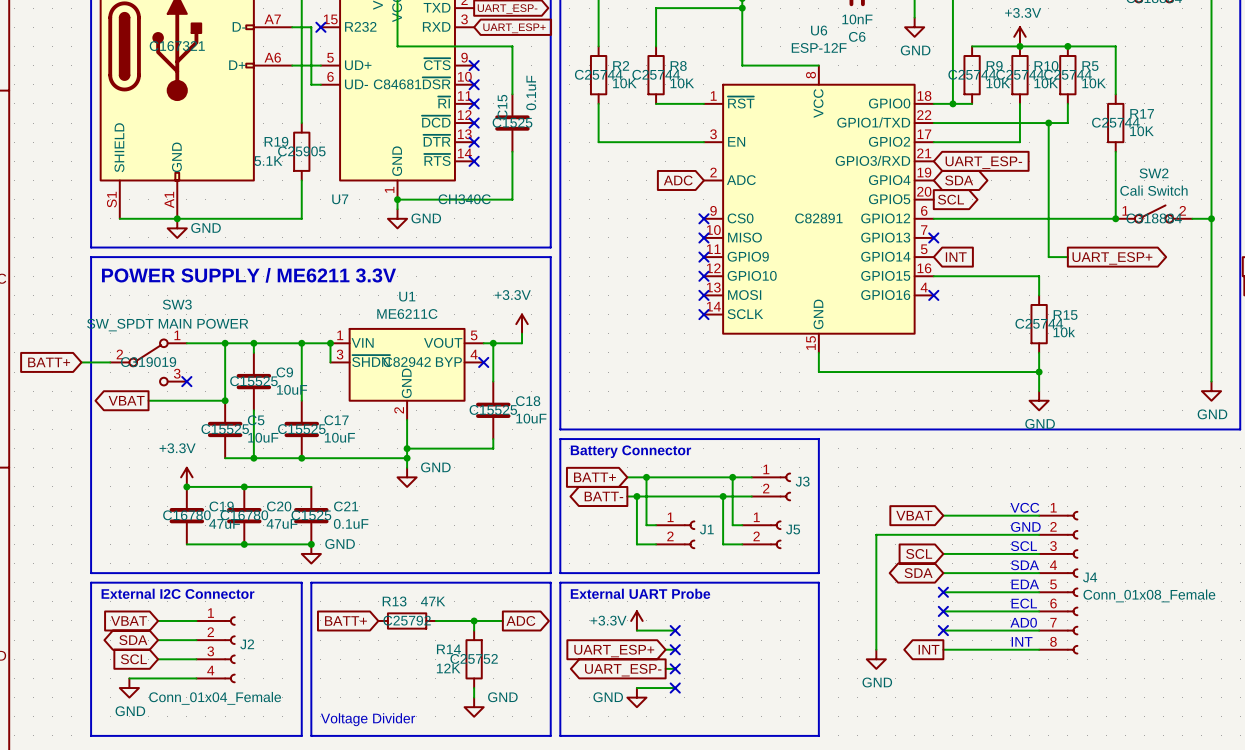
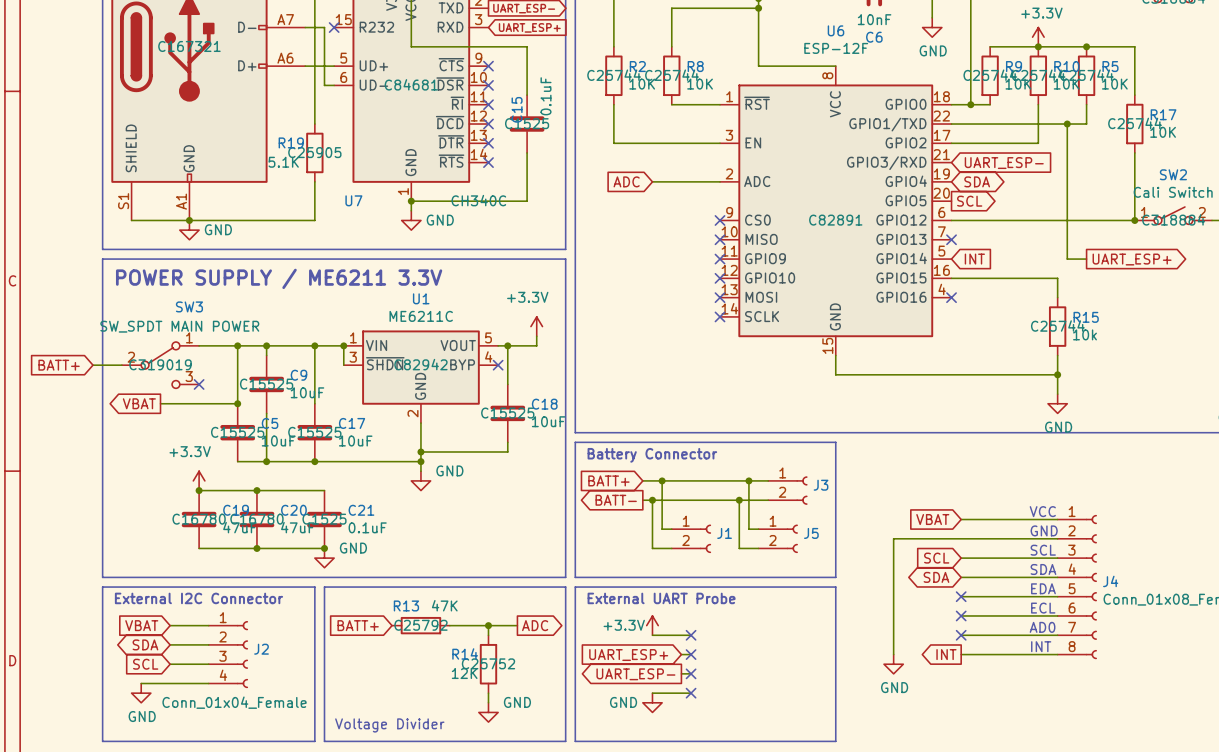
wire: none -> (652, 181) (720, 181)
global label position: ADC (678, 180) -> ADC (626, 181)

